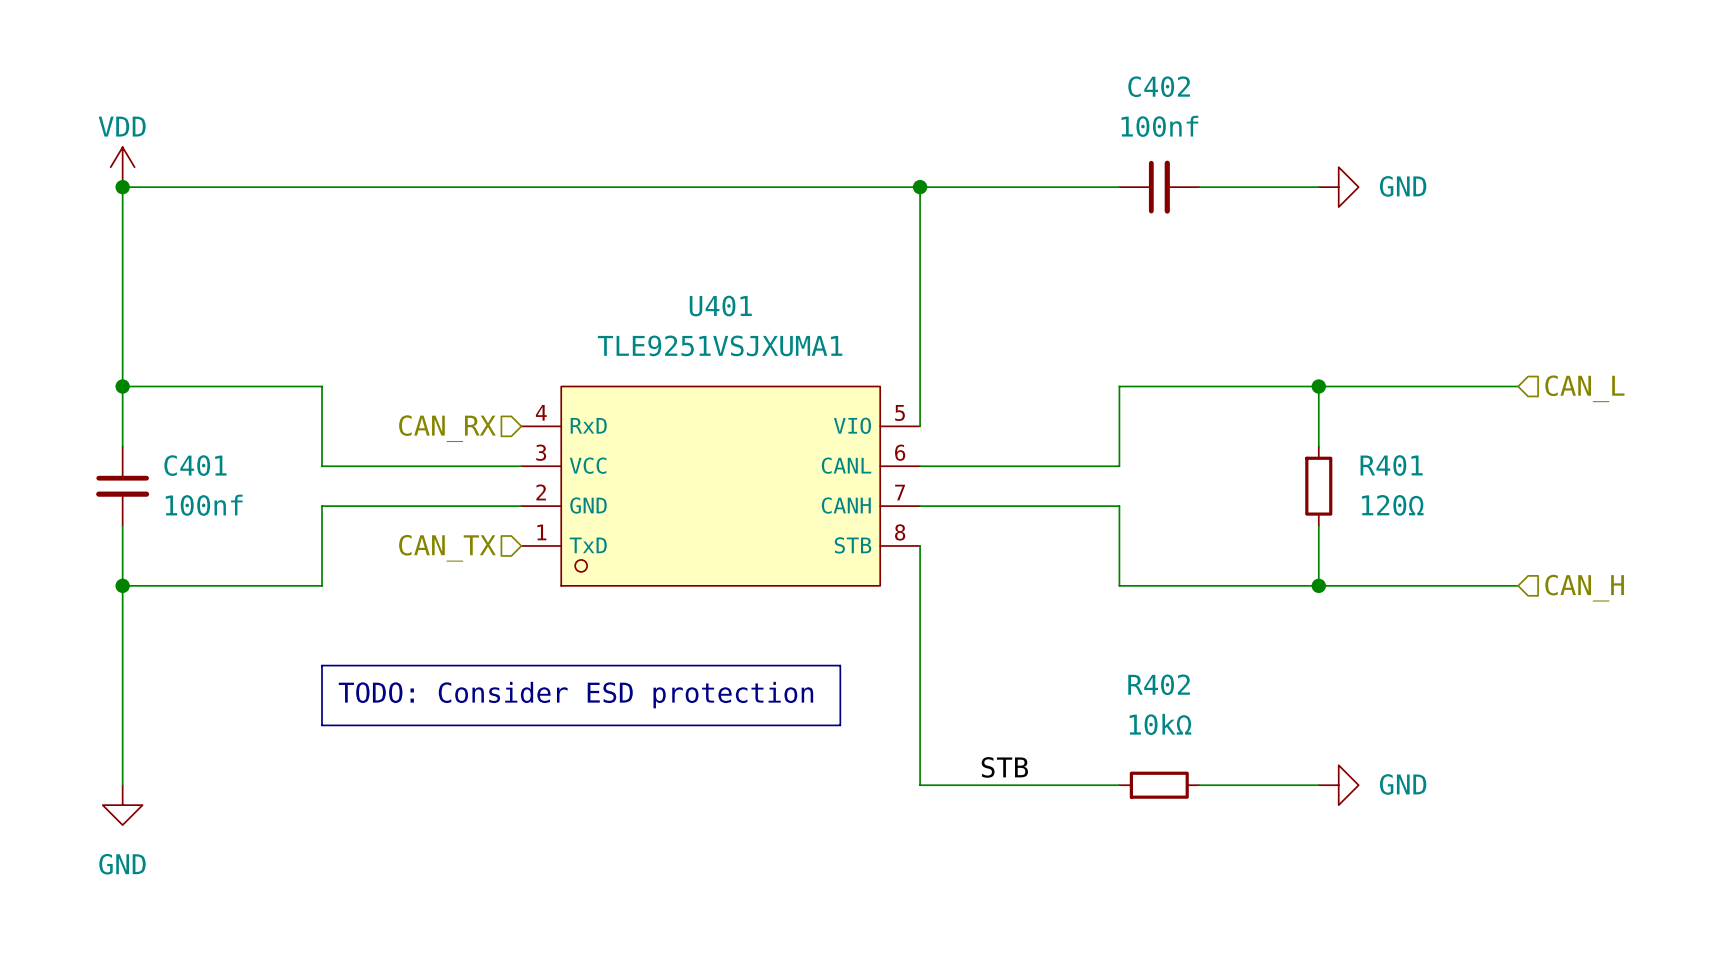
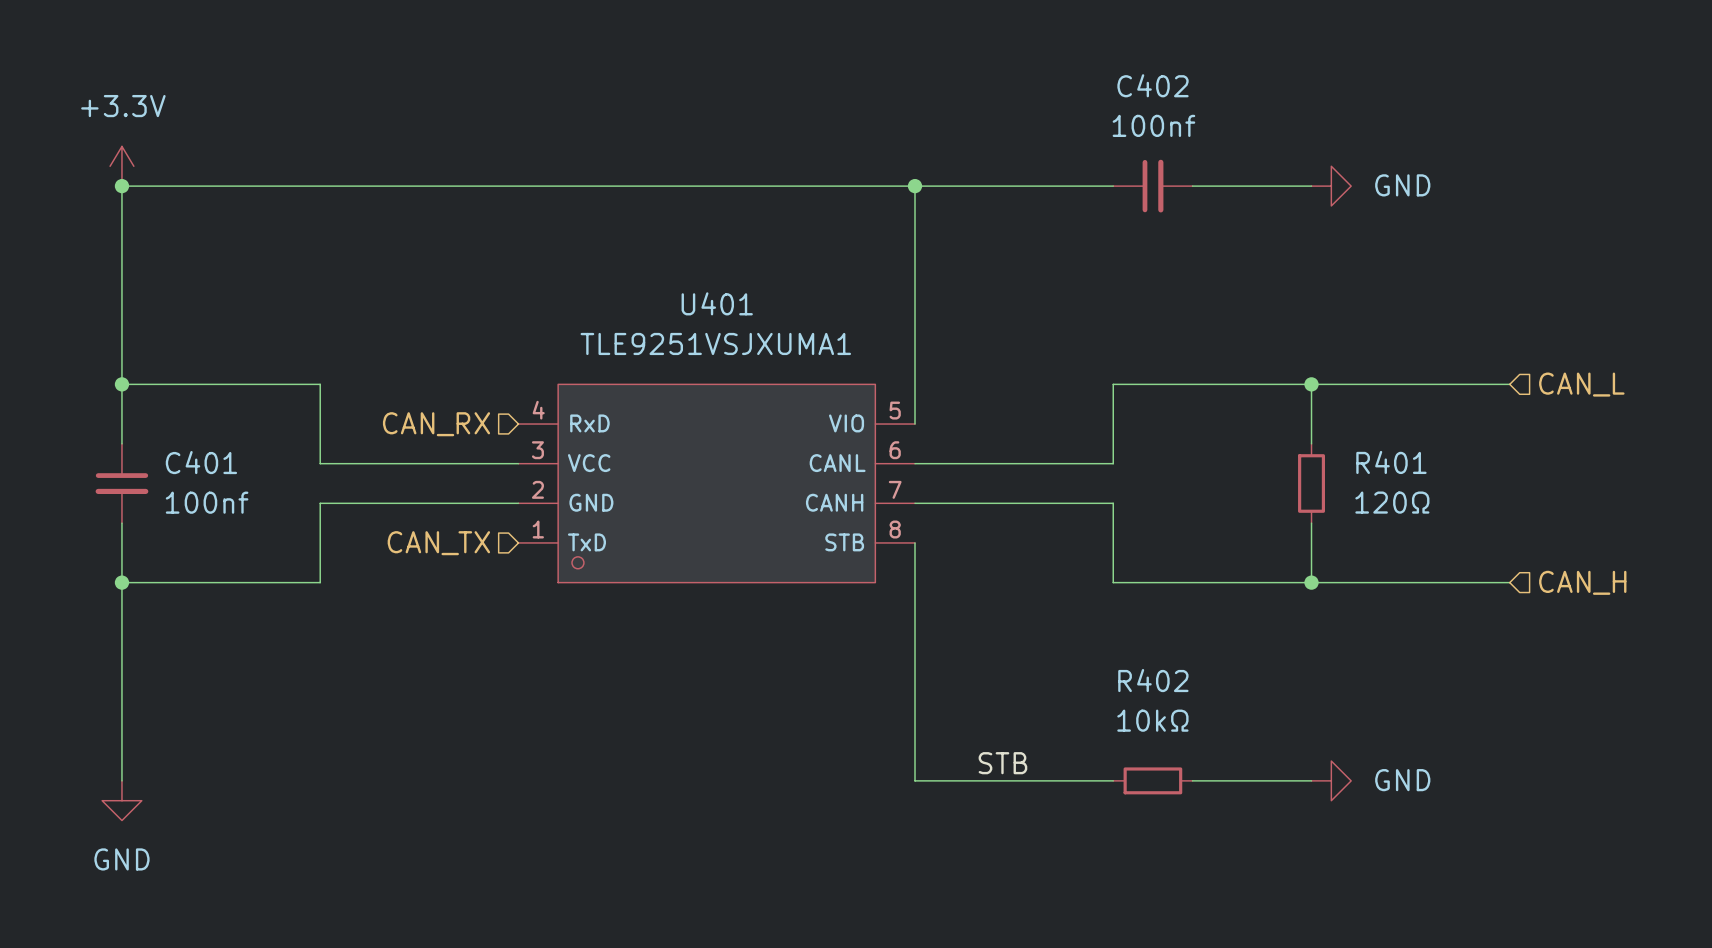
power symbol: VDD (122, 167) -> +3.3V (121, 166)
line: (322, 665) (840, 665) (840, 725) (322, 725) (322, 665) -> none
text: TODO: Consider ESD protection (575, 695) -> none

